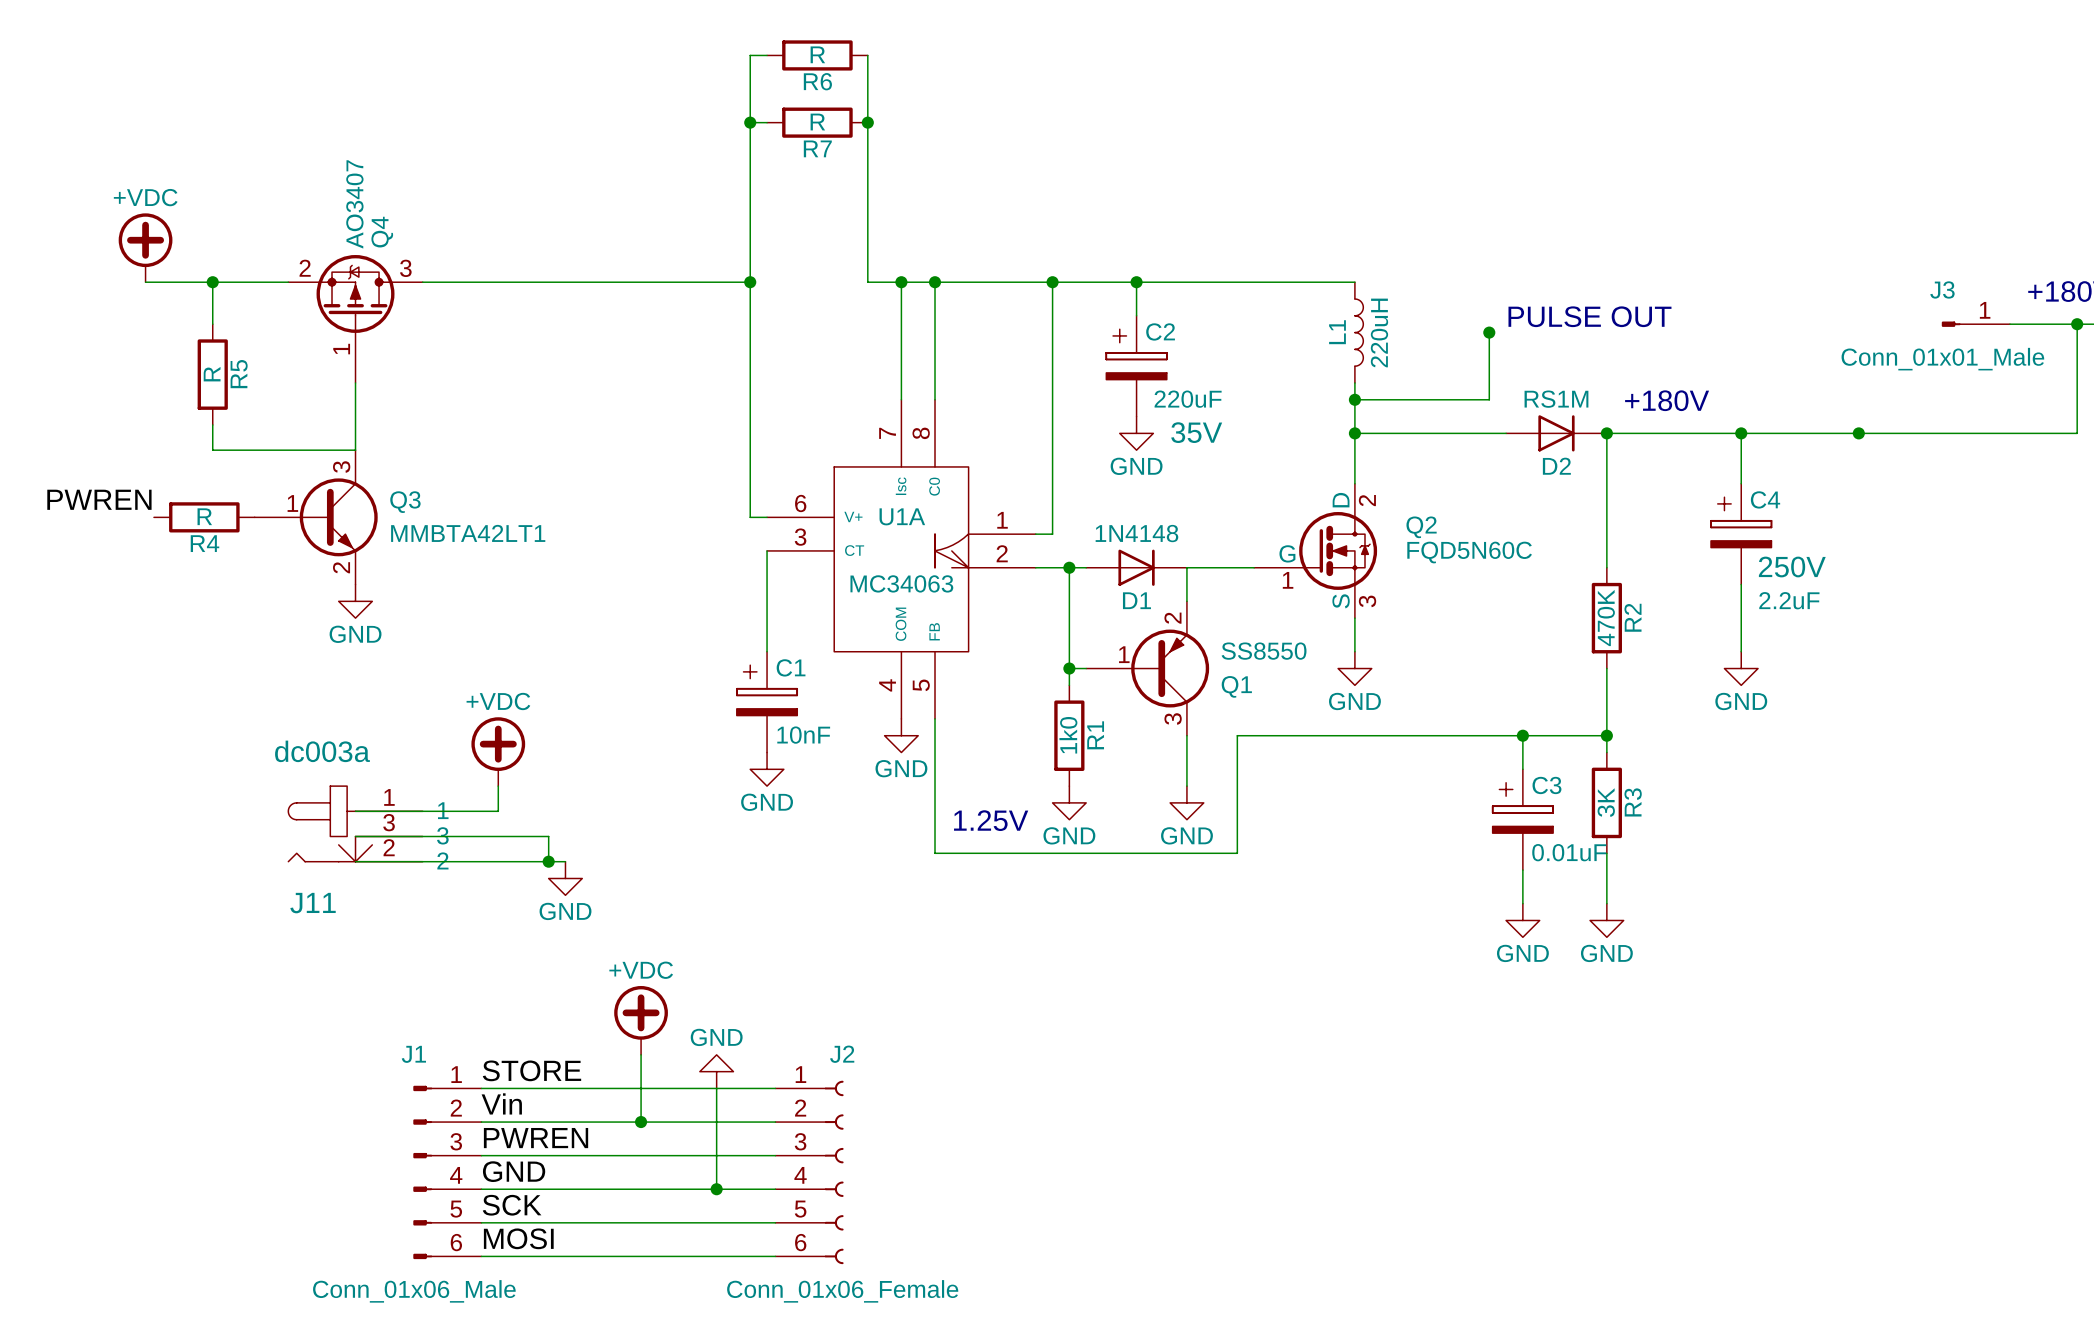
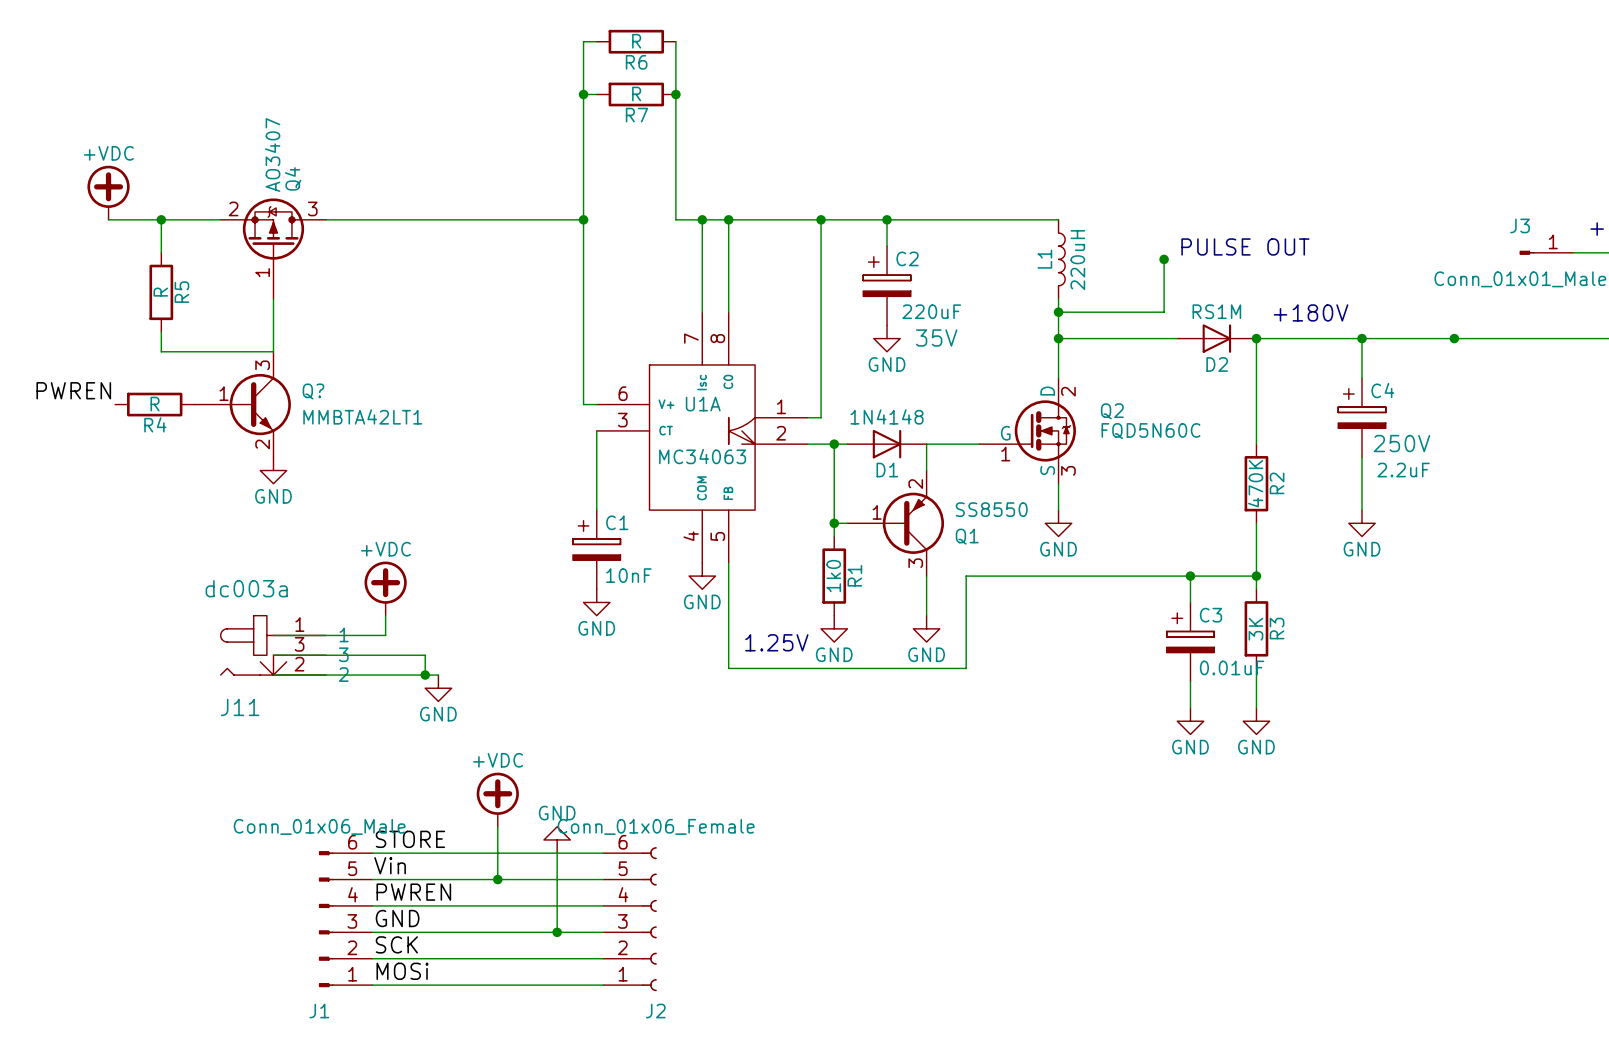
Q3 name: Q3 (405, 502) -> Q? (313, 391)
J1 flip: as is (422, 1172) -> up-down (326, 919)
J2 flip: as is (834, 1172) -> up-down (649, 919)
label: MOSI (518, 1238) -> MOSi (402, 971)

